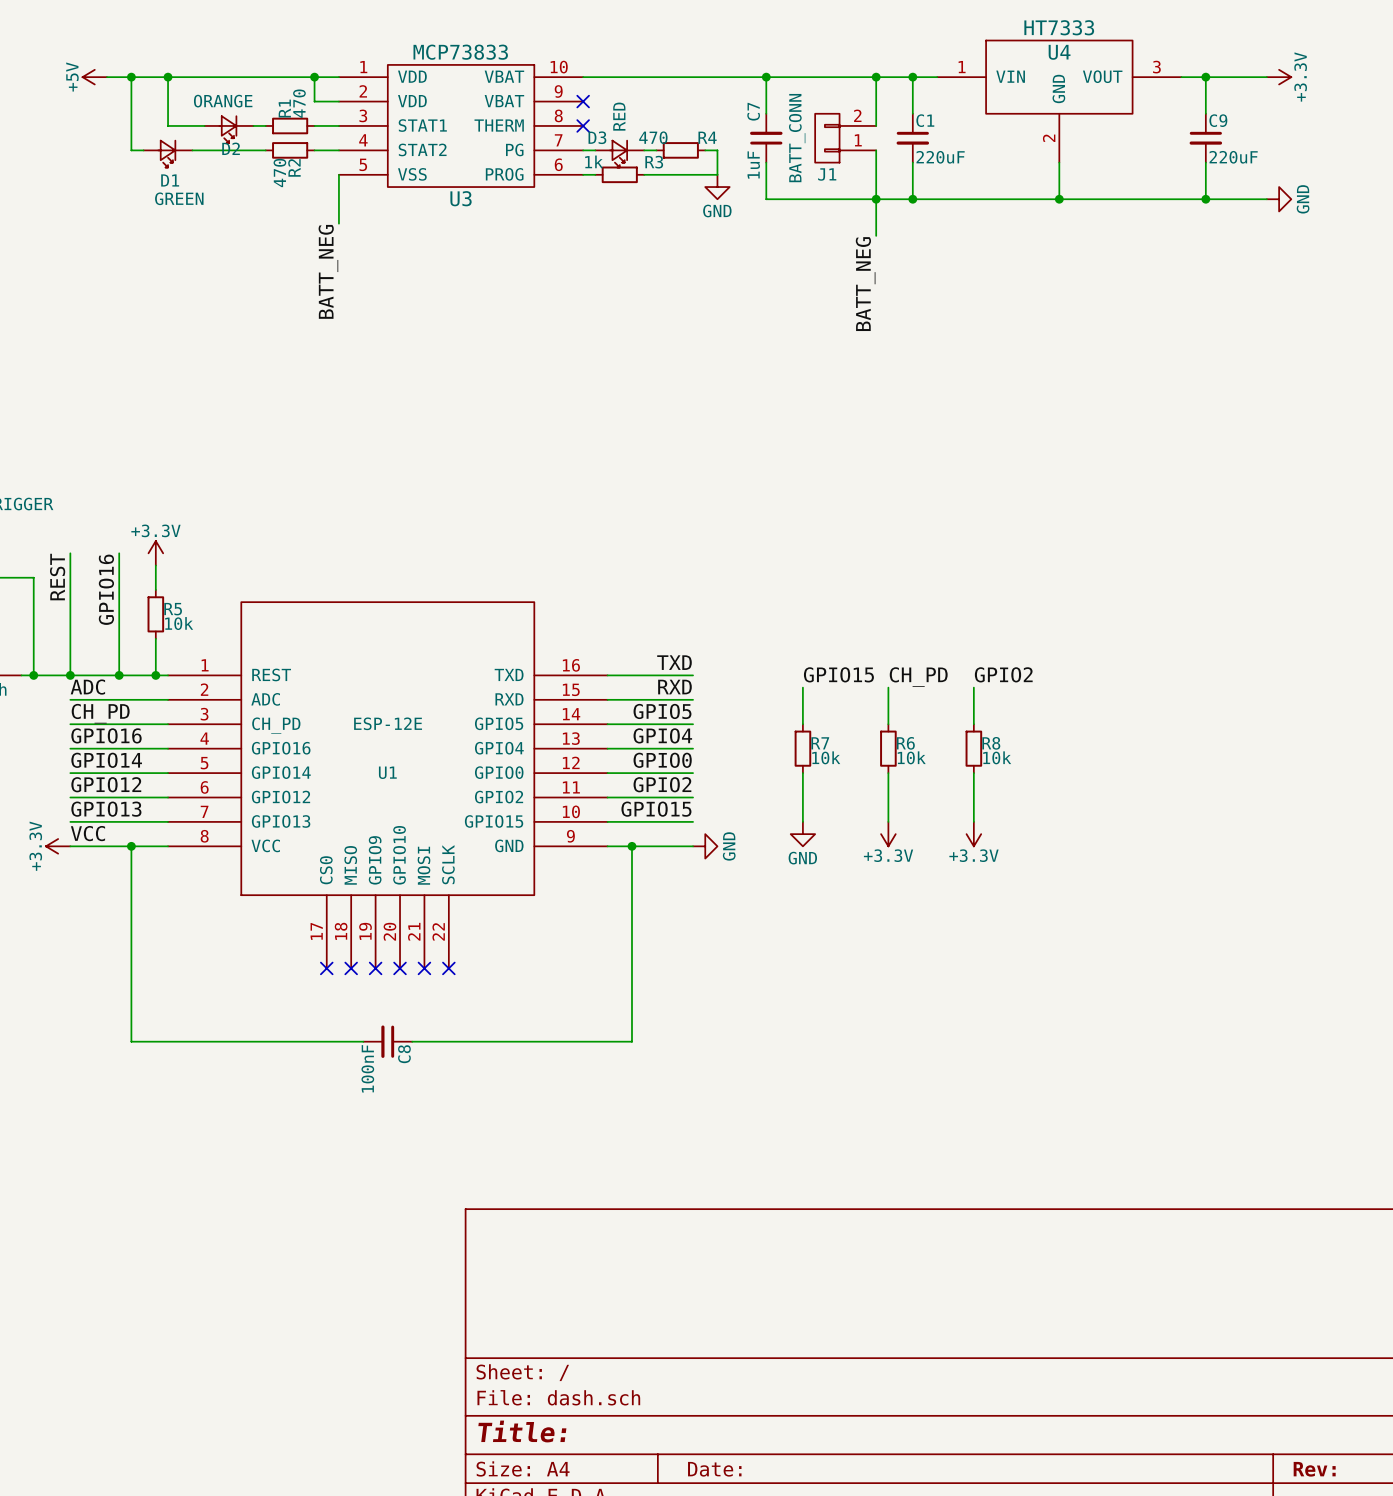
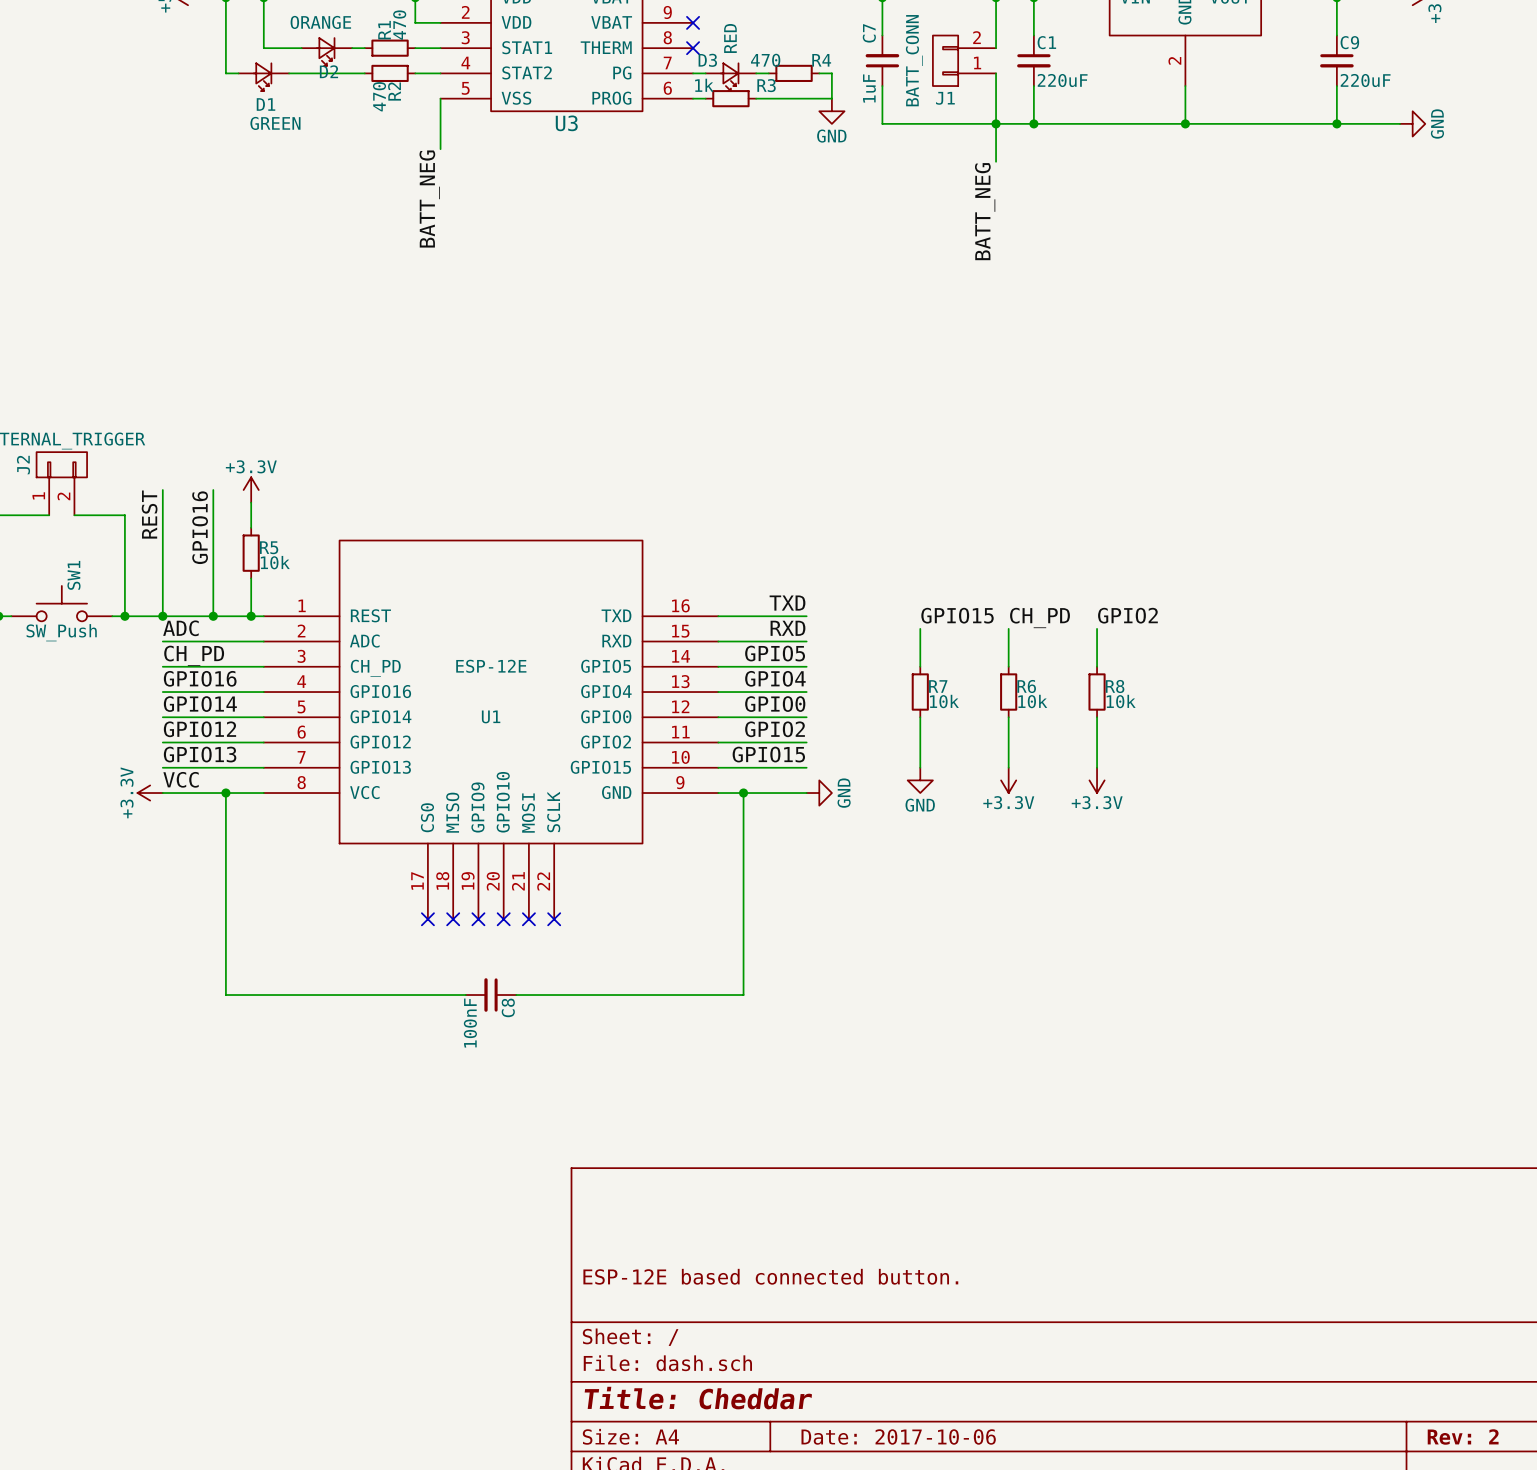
title block: none -> ESP-12E based connected button. (770, 1276)
title block: Title: (522, 1431) -> Title: Cheddar (698, 1398)
title block: Date: (714, 1469) -> Date: 2017-10-06 (898, 1436)
title block: Rev: (1314, 1469) -> Rev: 2 (1463, 1436)

